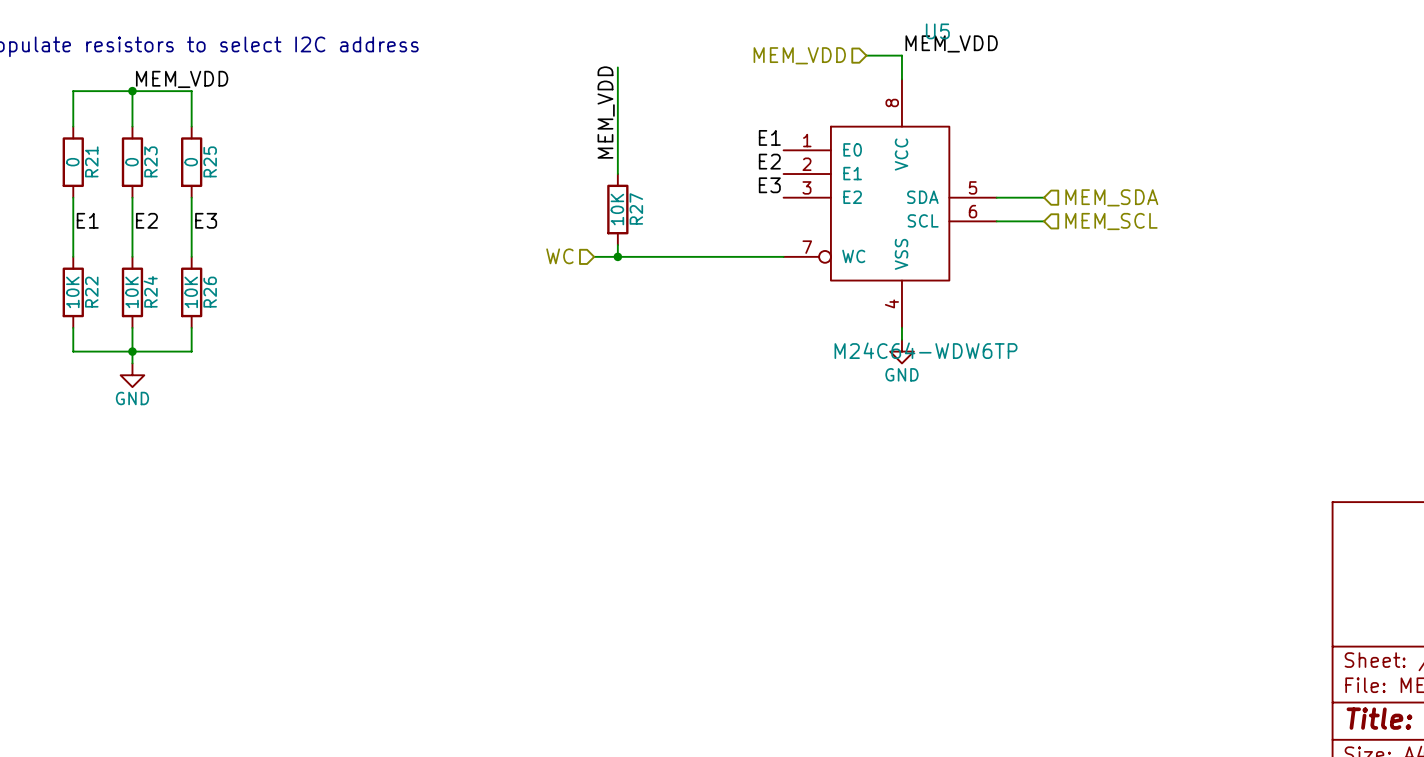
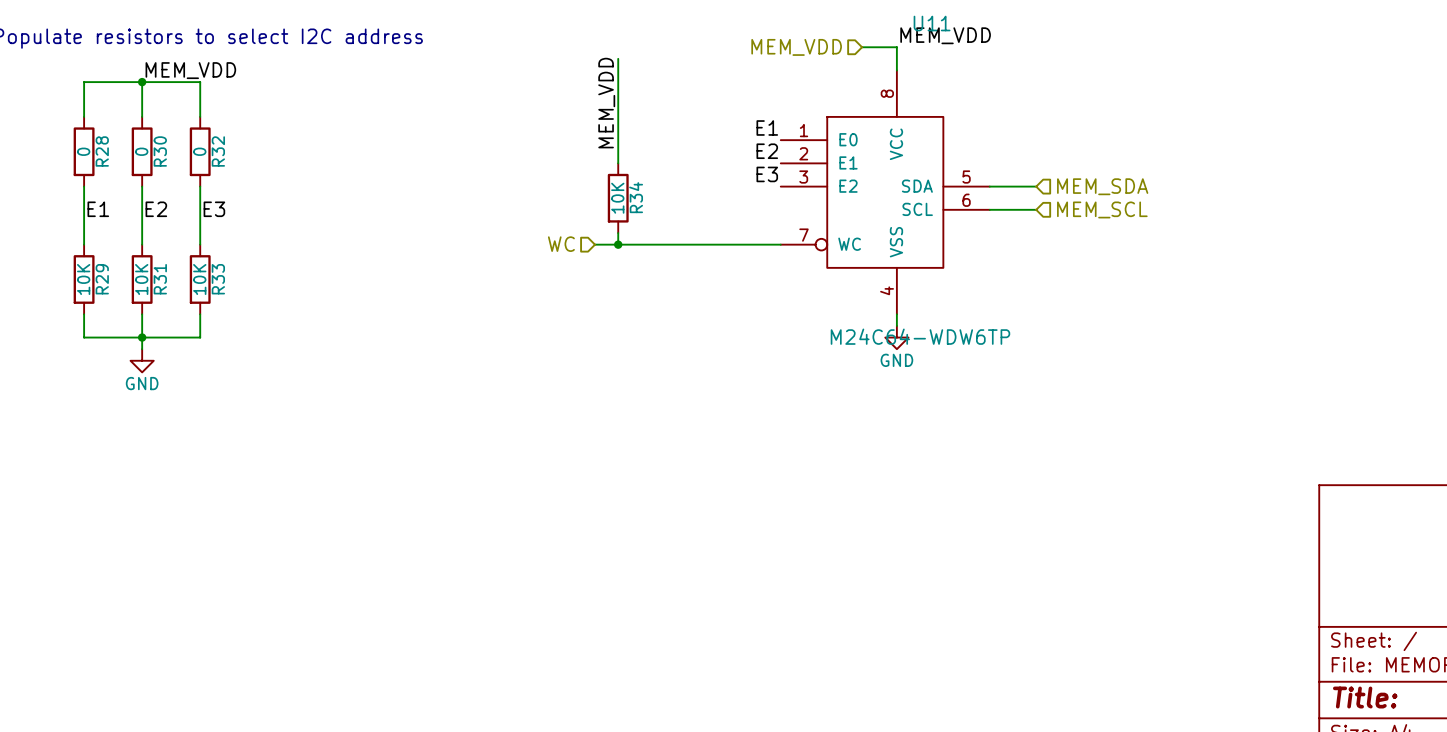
U5 name: U5 (937, 31) -> U11 (932, 23)
R21 name: R21 (91, 161) -> R28 (102, 151)
R23 name: R23 (150, 161) -> R30 (160, 151)
R25 name: R25 (210, 161) -> R32 (218, 151)
R27 name: R27 (636, 208) -> R34 (636, 197)
R24 name: R24 (150, 291) -> R31 (160, 279)
R22 name: R22 (91, 292) -> R29 (102, 279)
R26 name: R26 (210, 292) -> R33 (218, 279)

